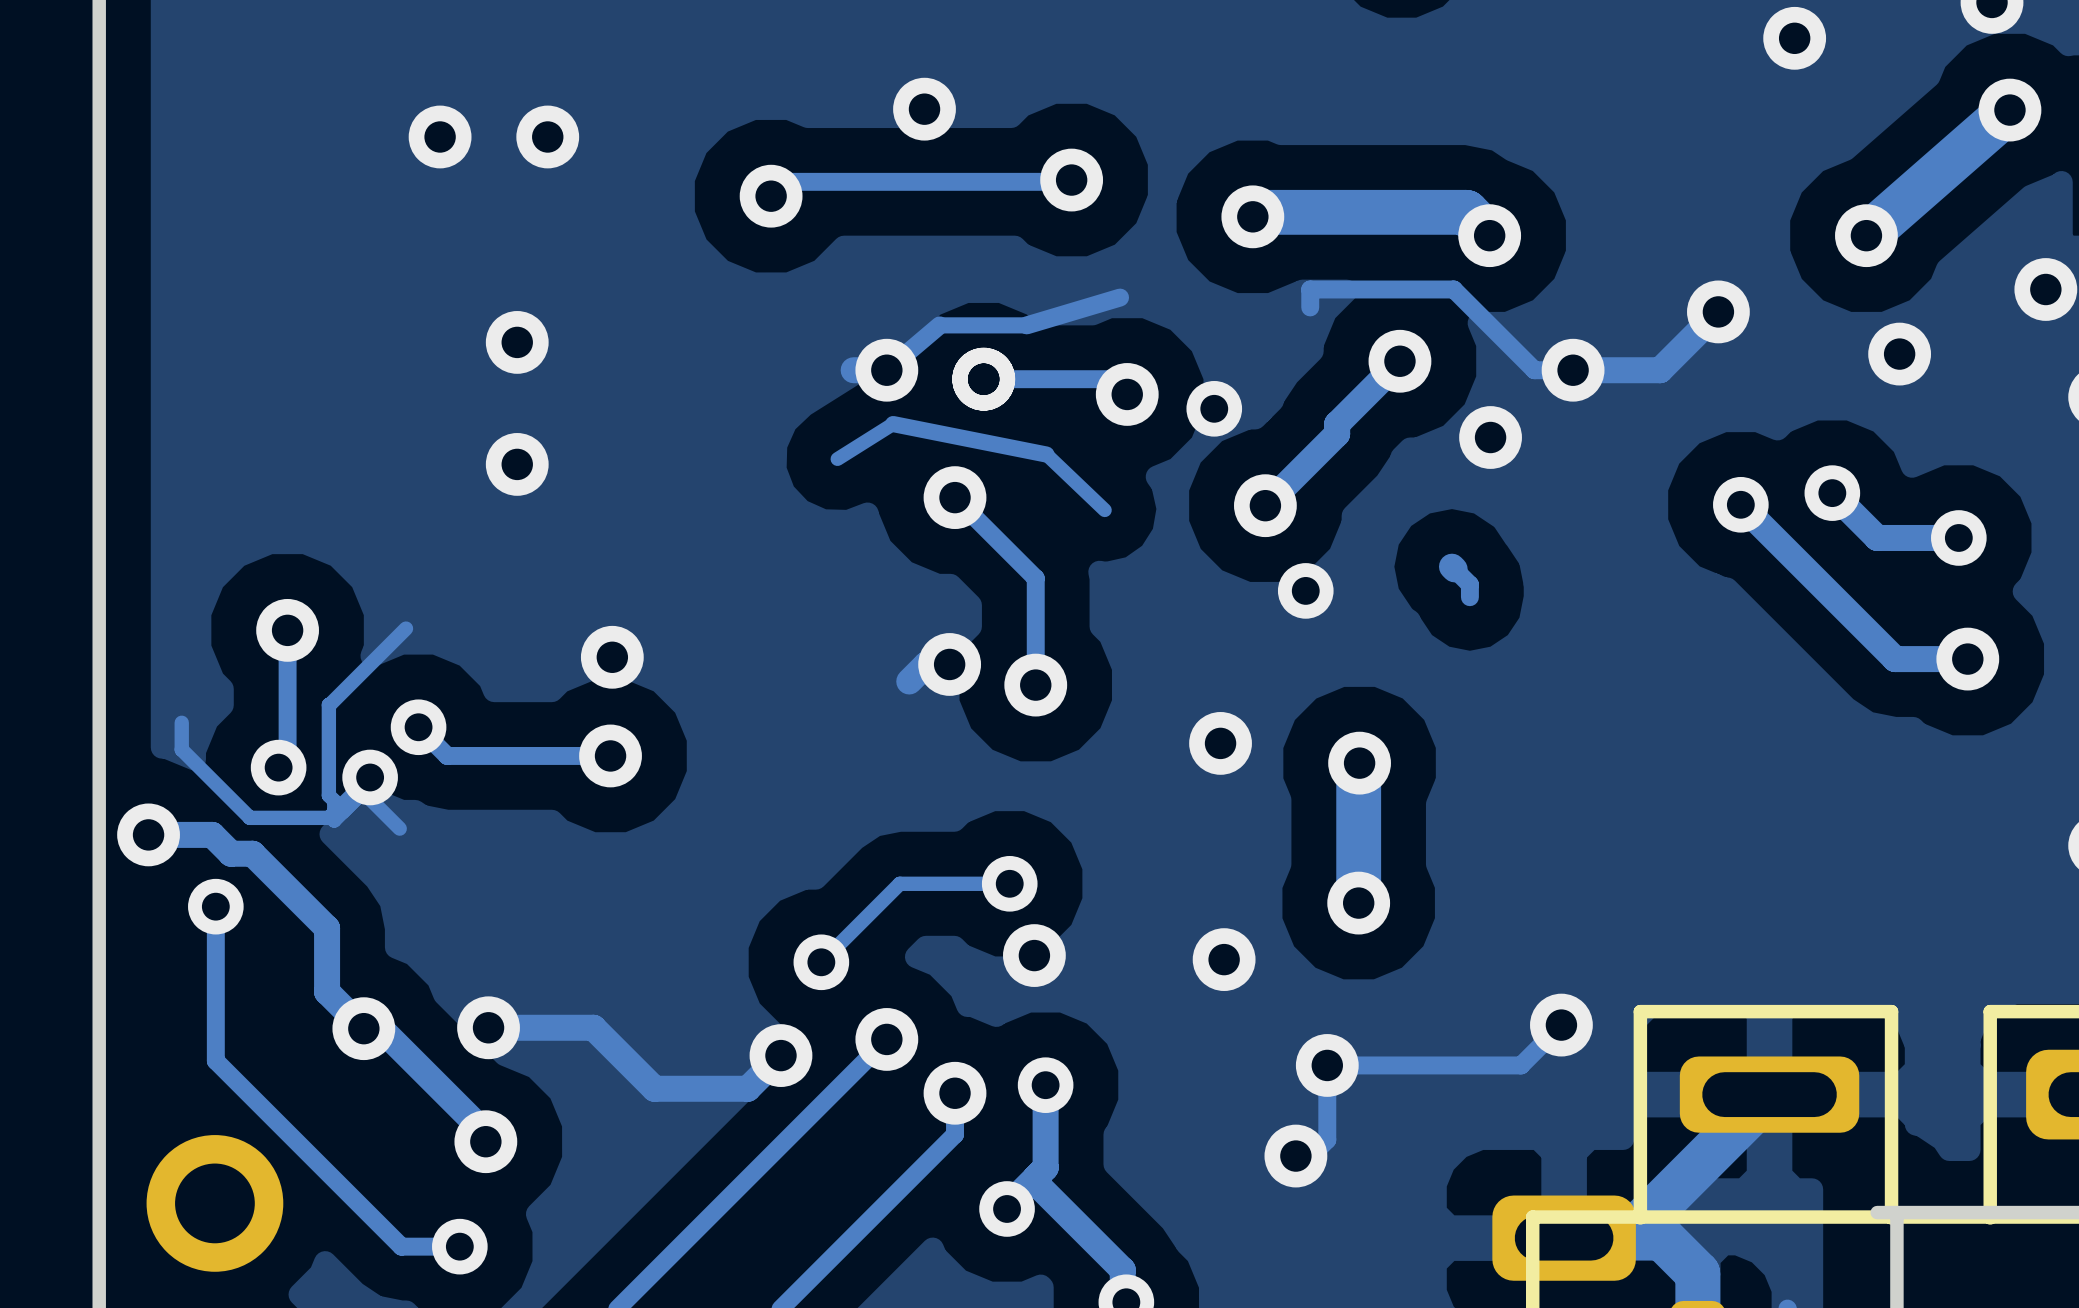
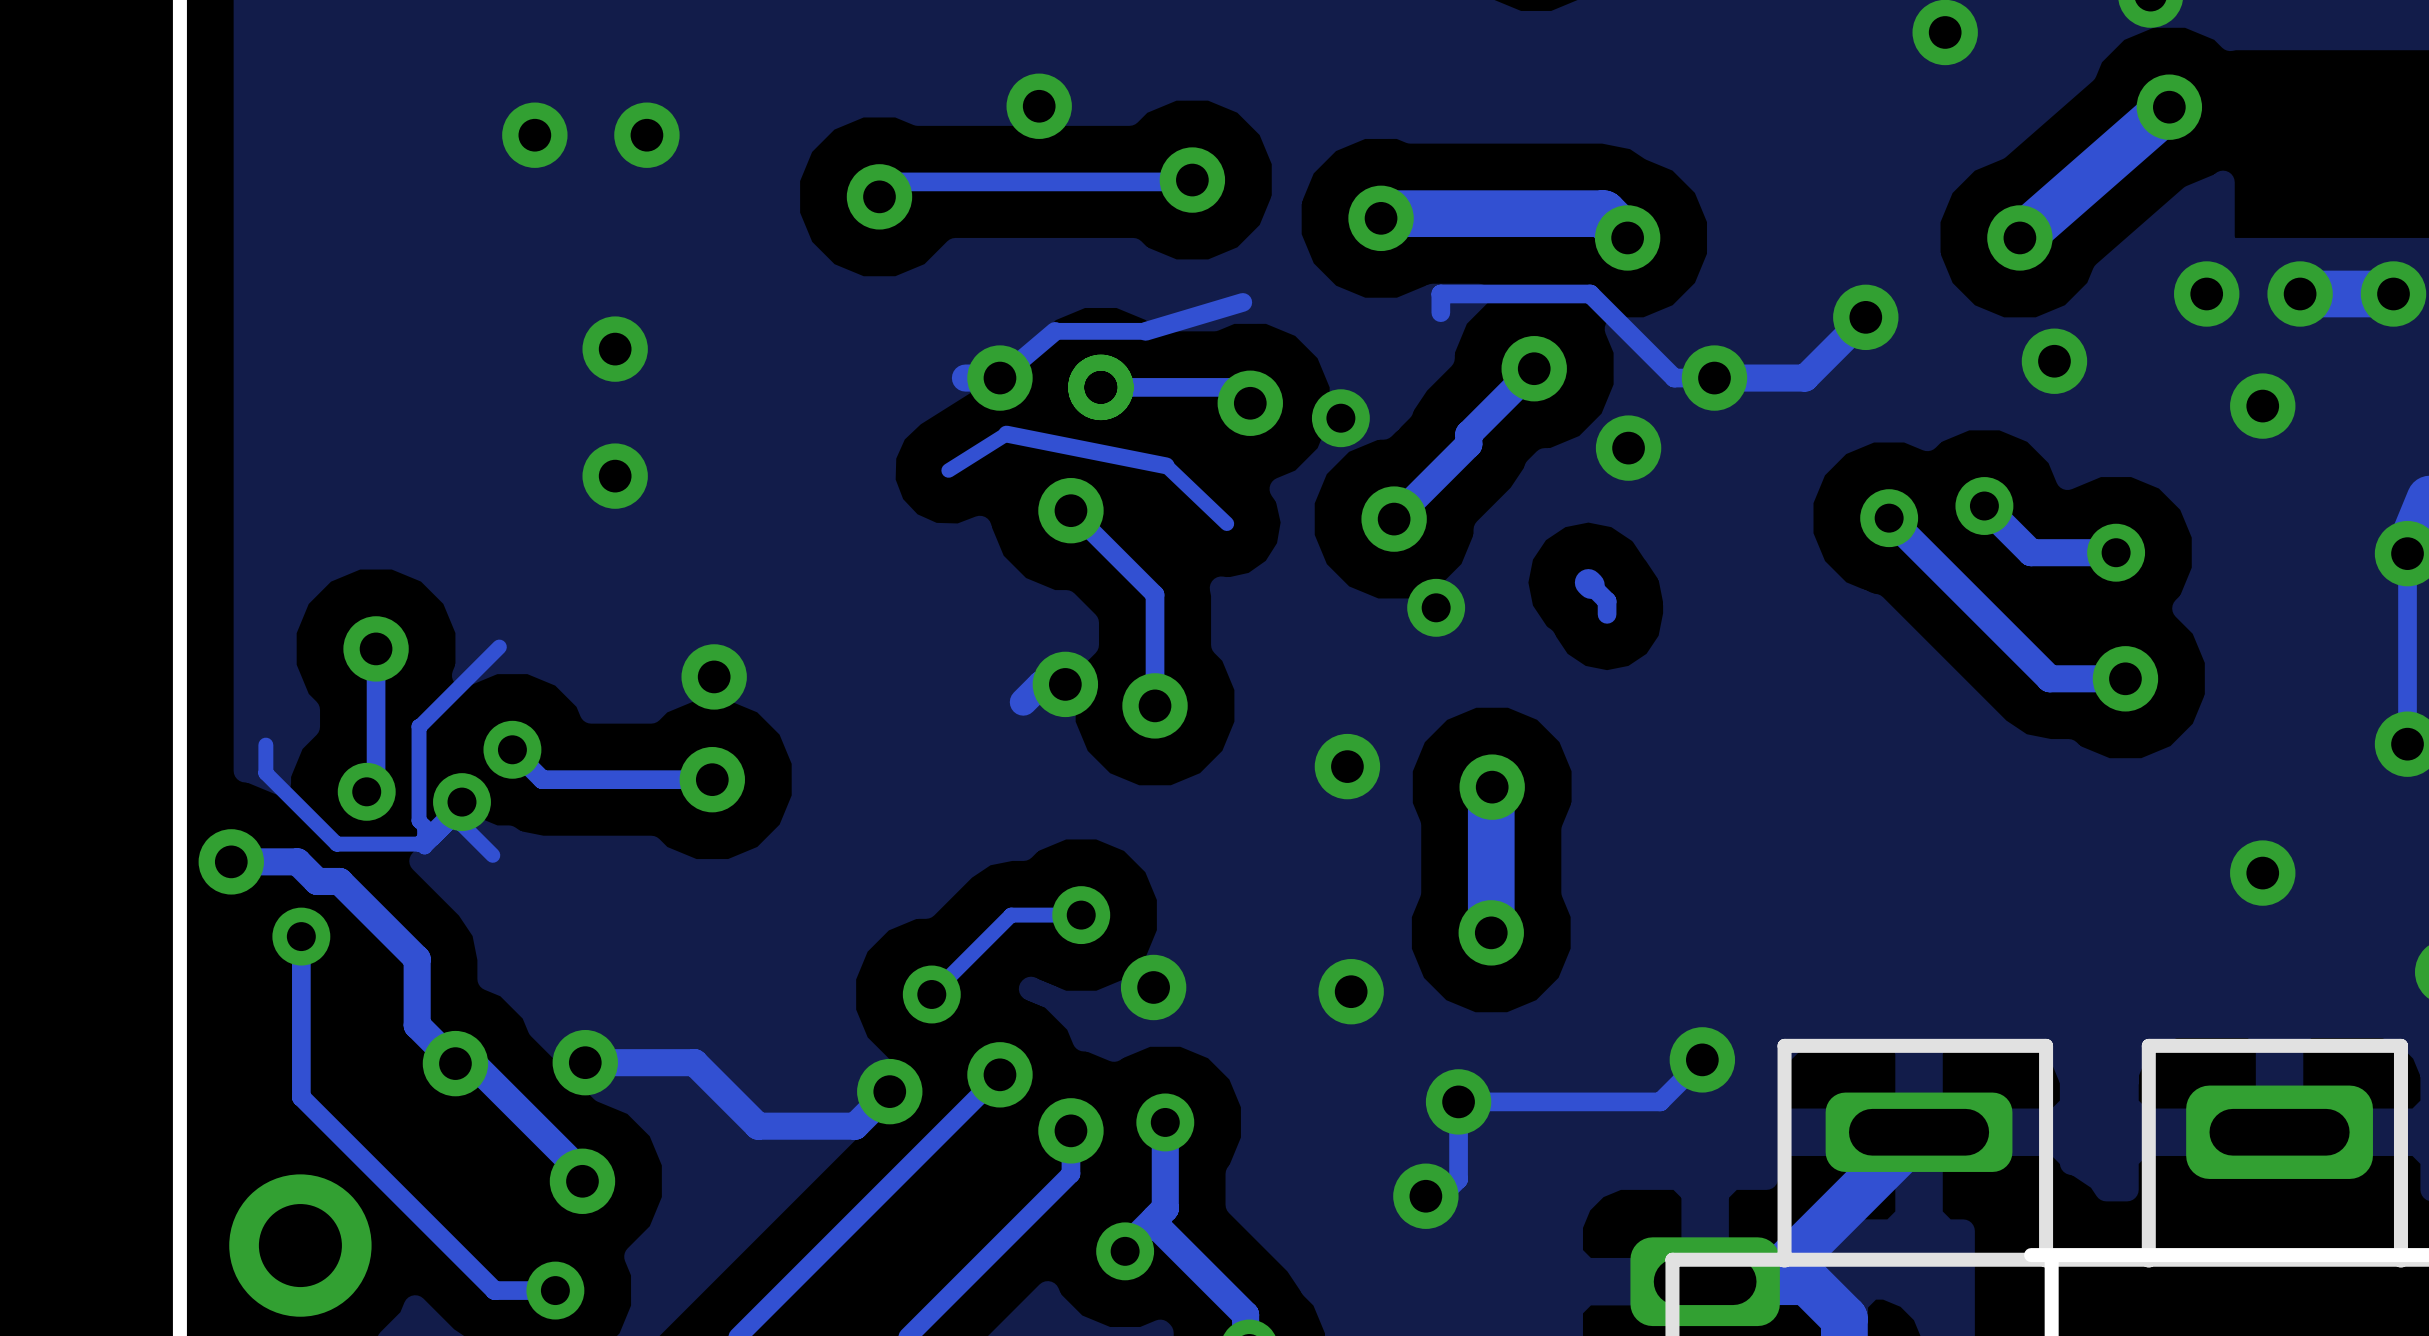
track: (1009, 883) (899, 883) (897, 886) -> (1081, 915) (1011, 915)
via position: (1009, 883) -> (1081, 915)

